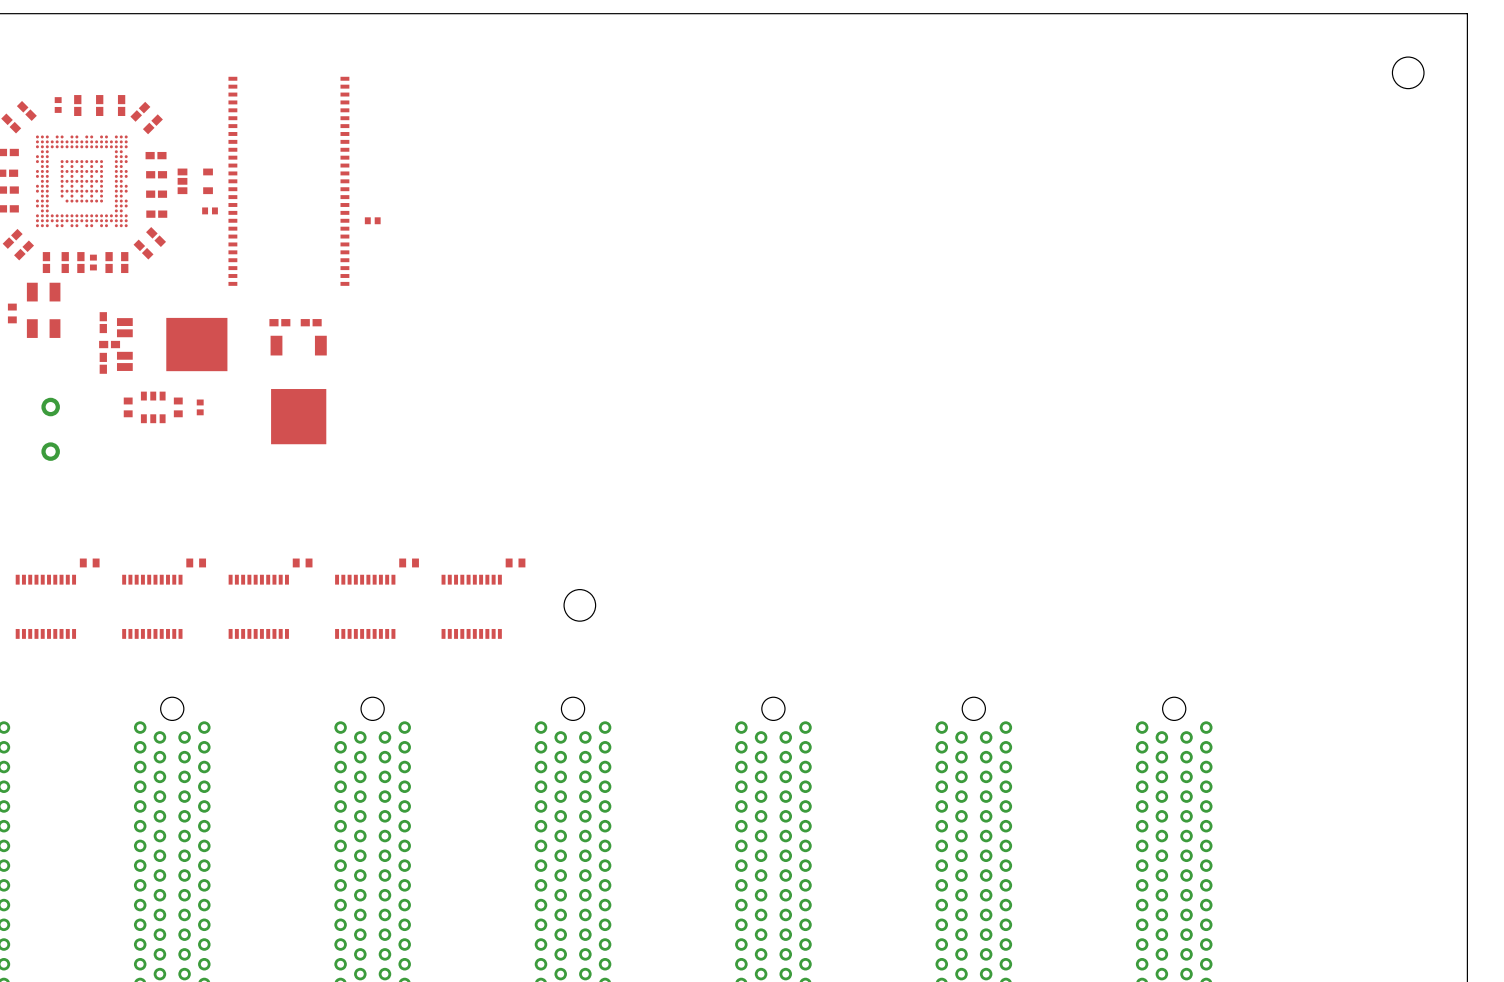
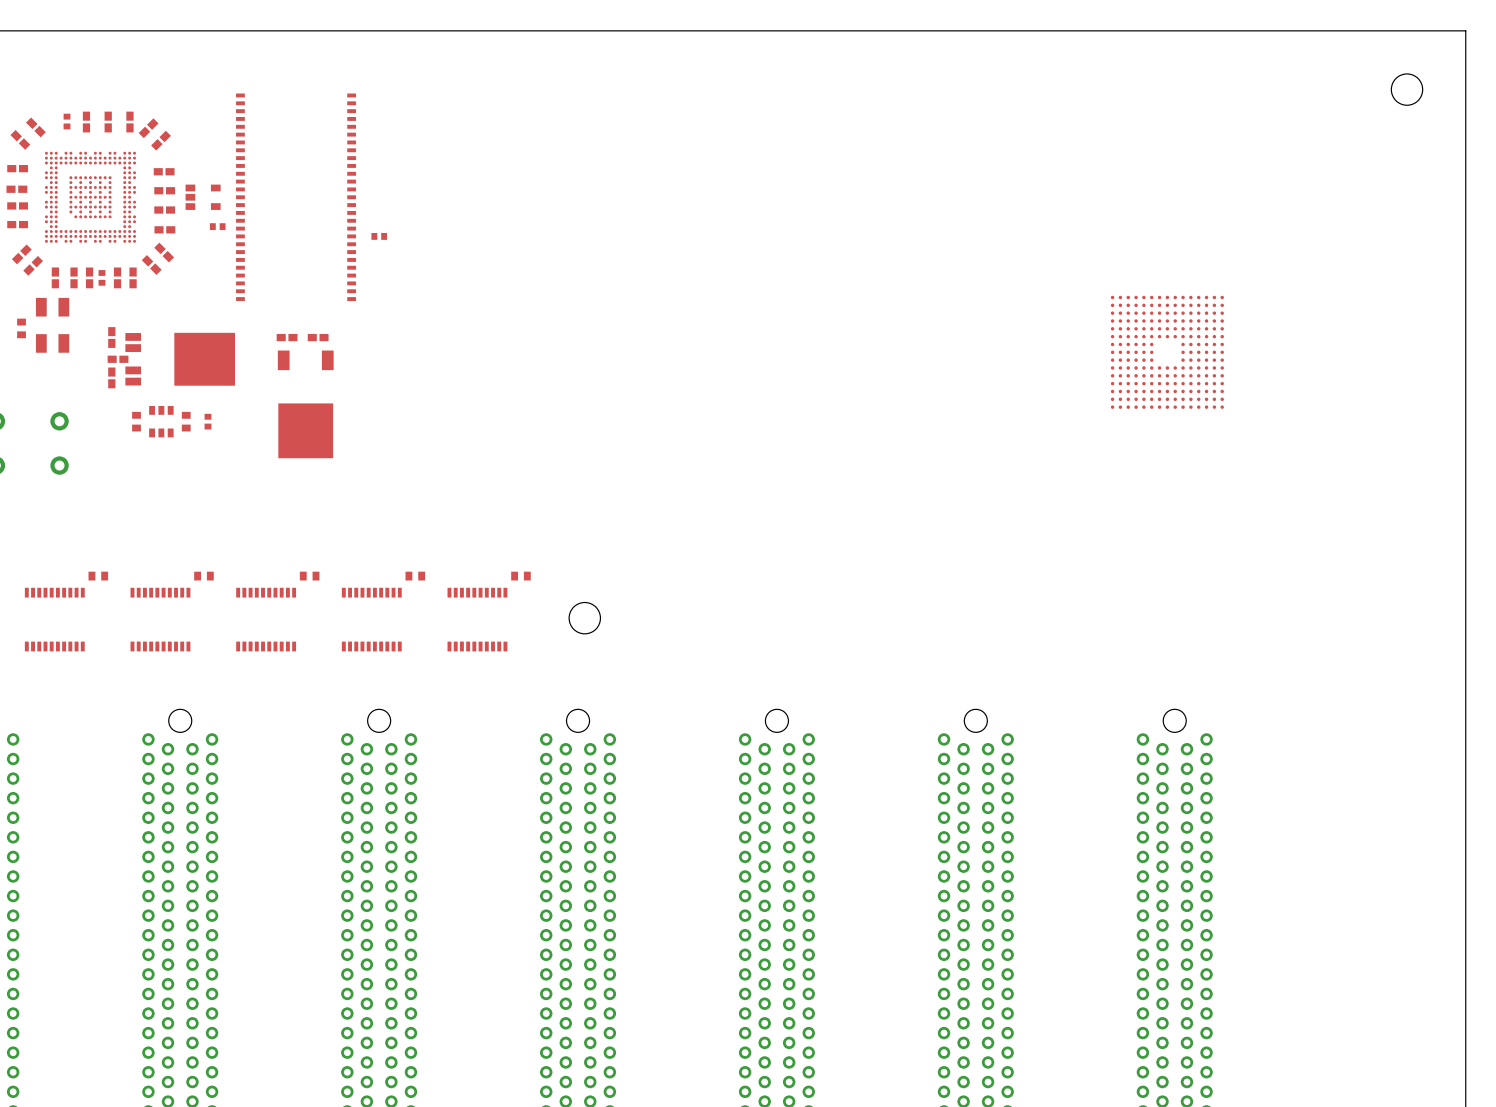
part: none -> (1167, 352)

